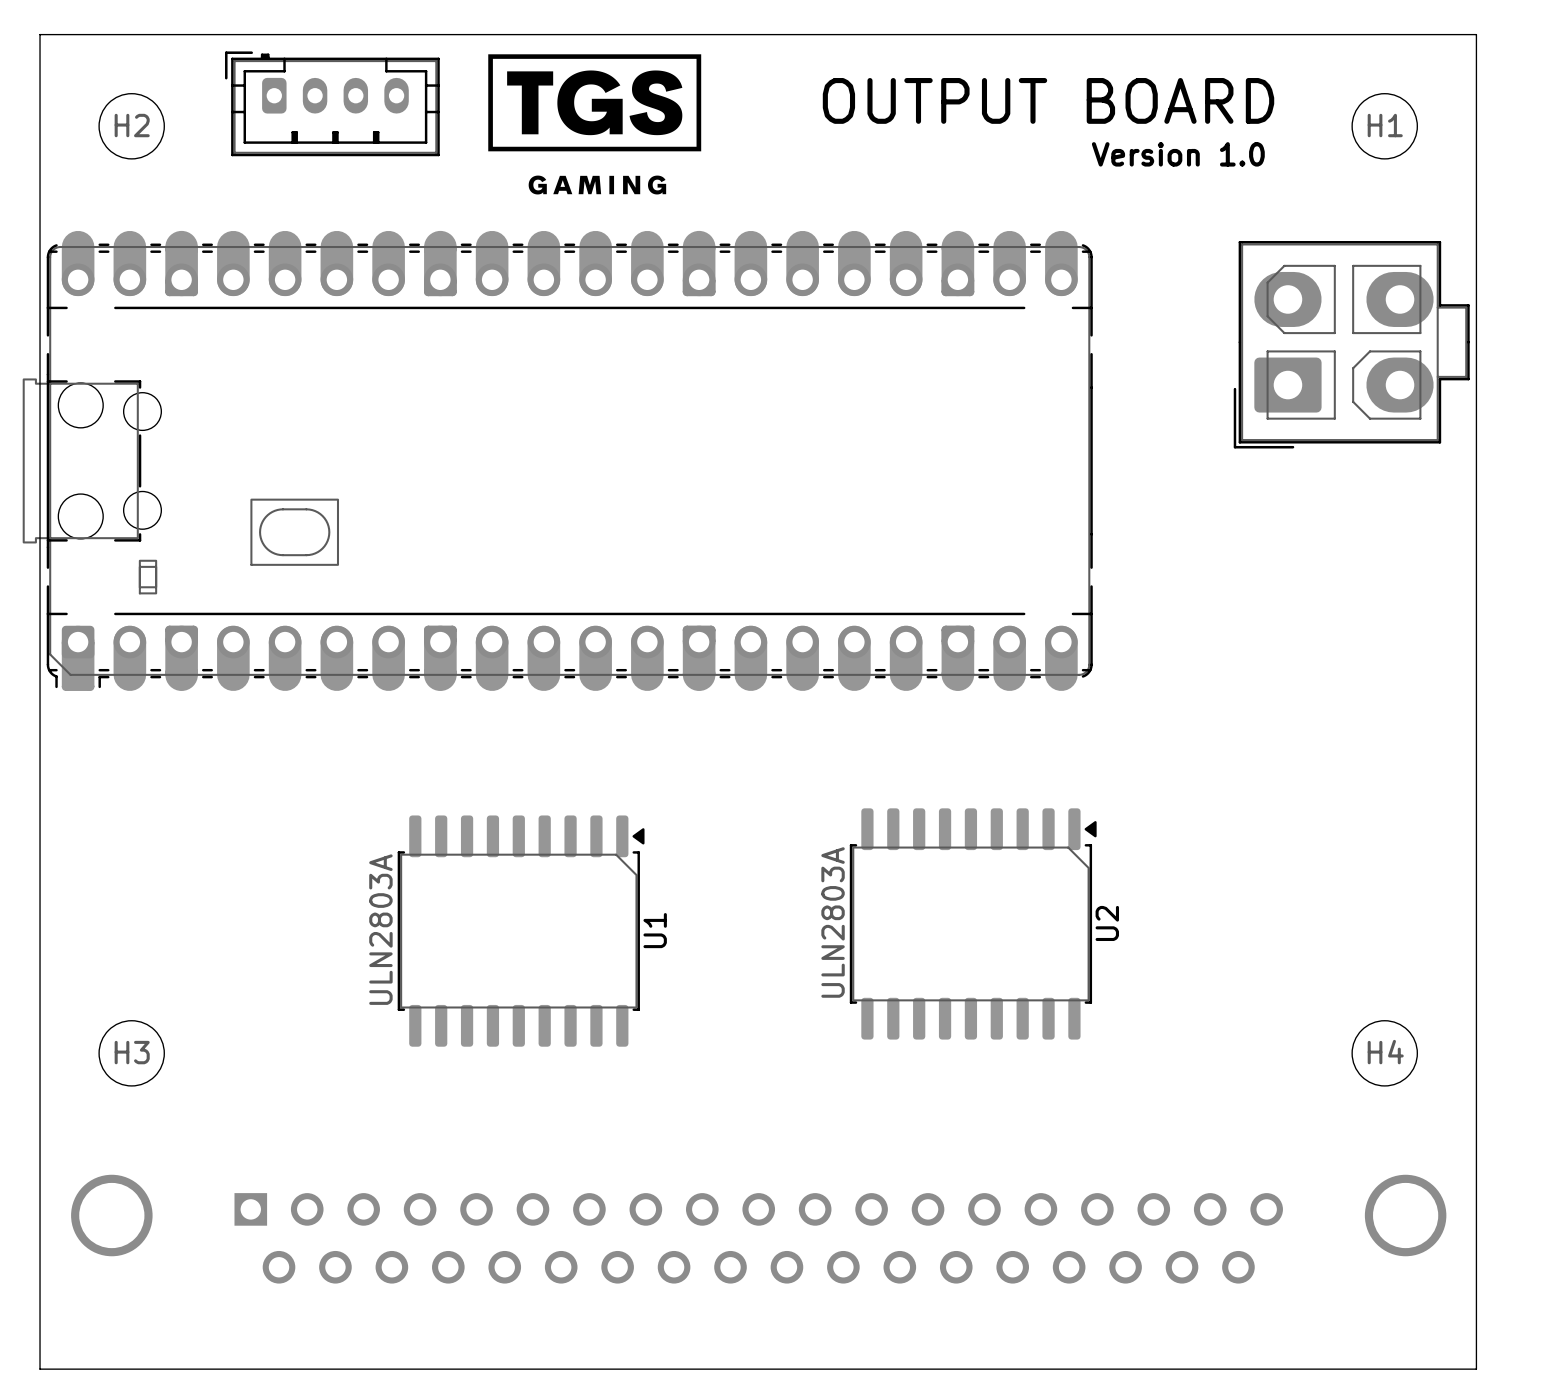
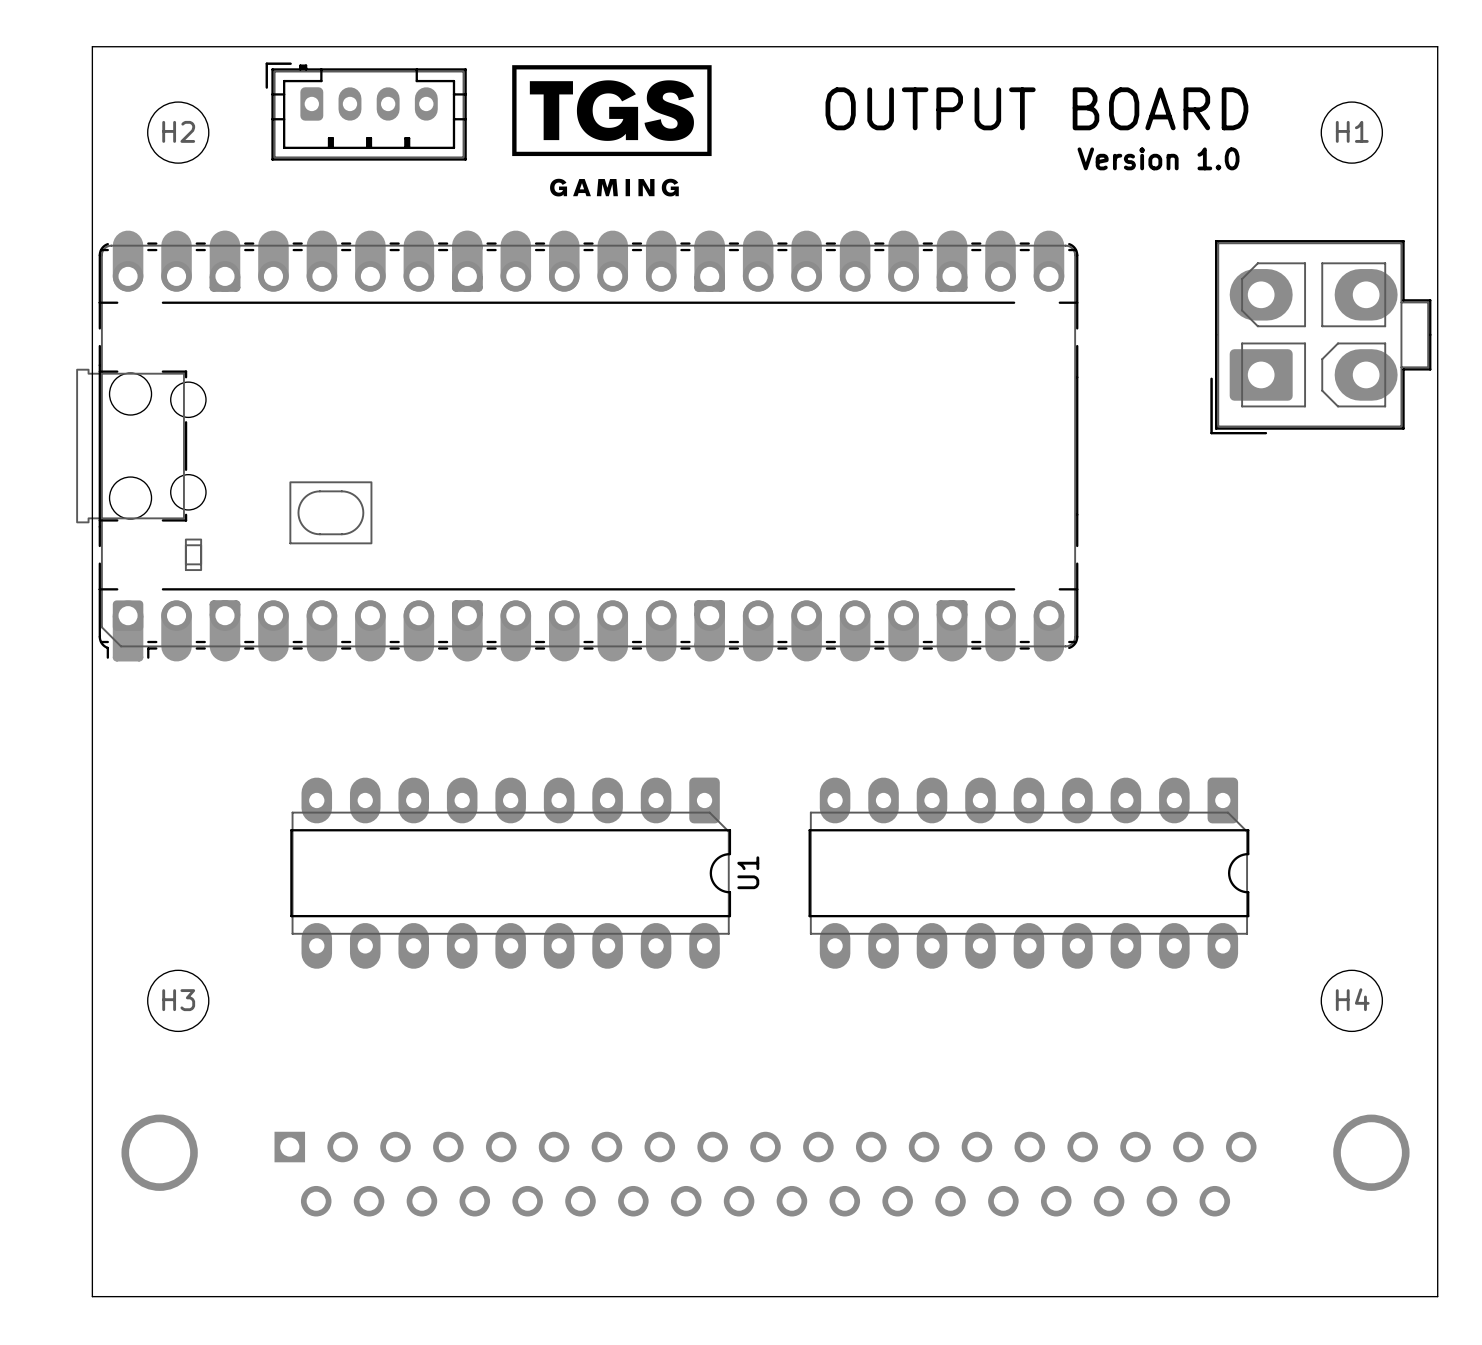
U1 footprint: [397, 815, 645, 1047] -> [290, 777, 732, 969]
part: none -> (1028, 873)
U2: ULN2803A (973, 923) -> none
U1 value: ULN2803A (380, 929) -> none
U1 name position: U1 (655, 930) -> U1 (748, 872)

